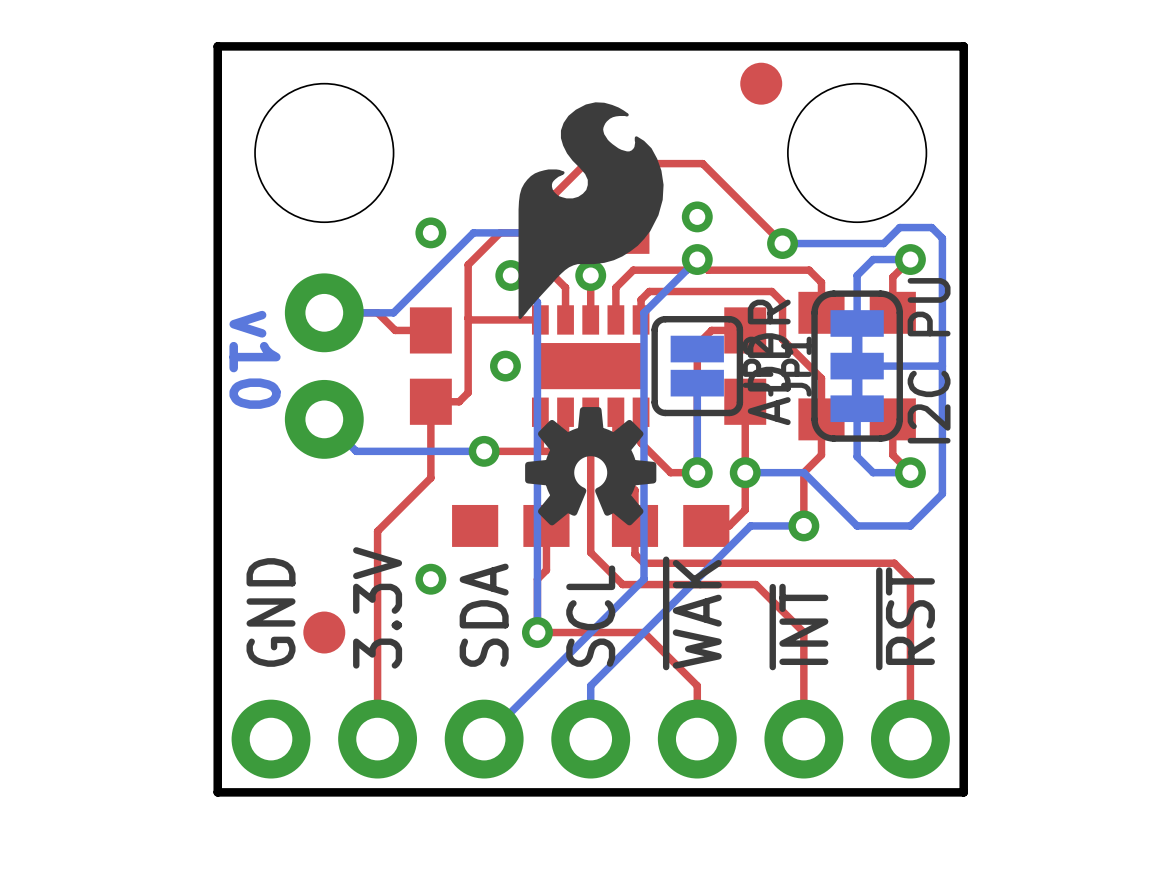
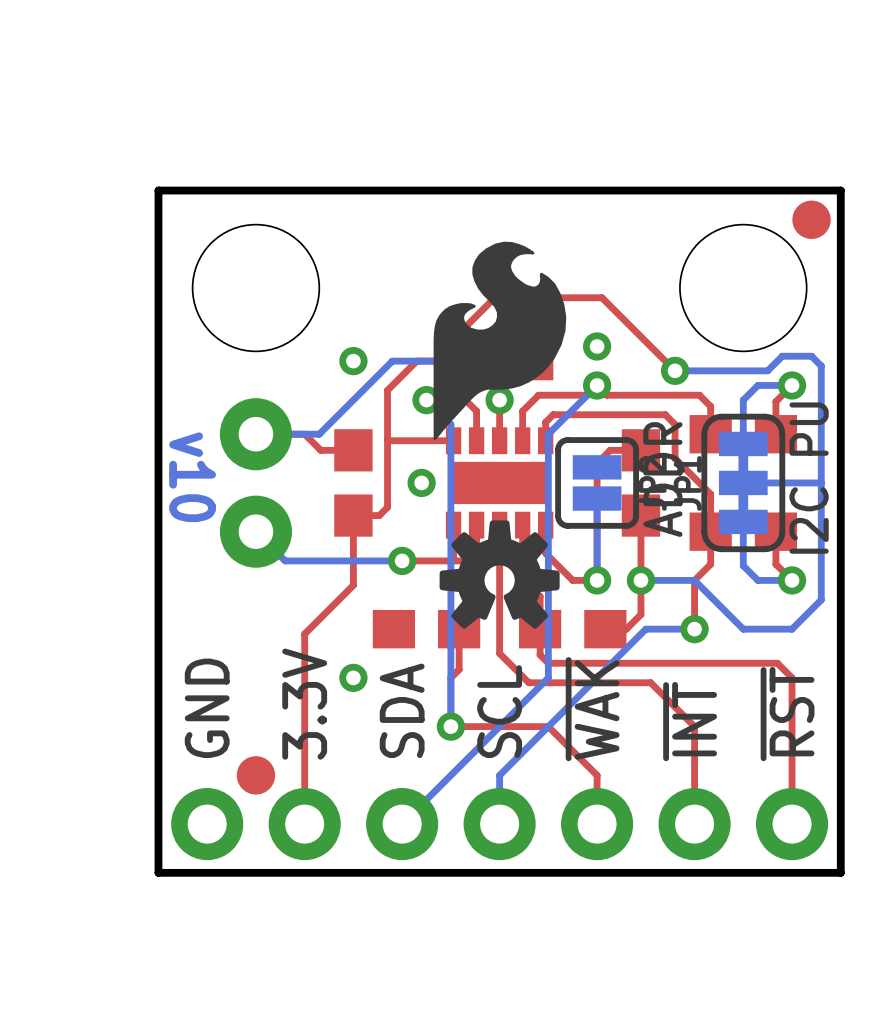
part position: (761, 83) -> (811, 219)
part position: (324, 632) -> (255, 775)

